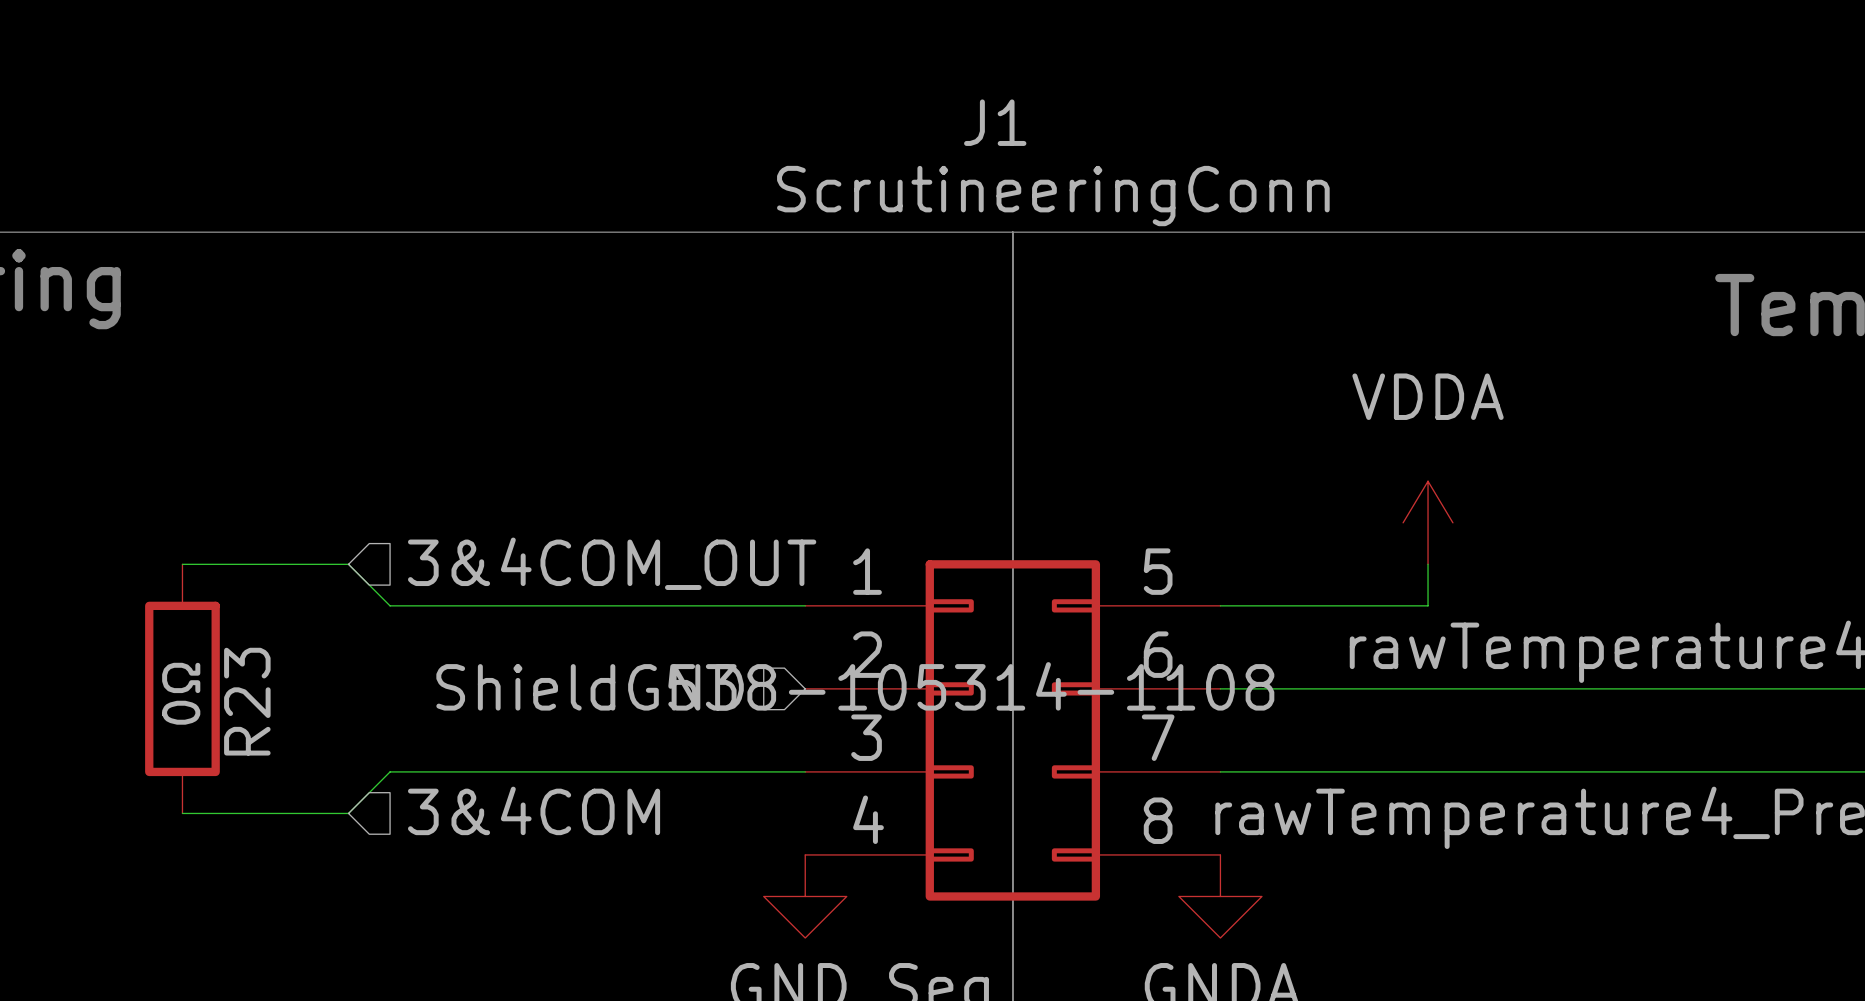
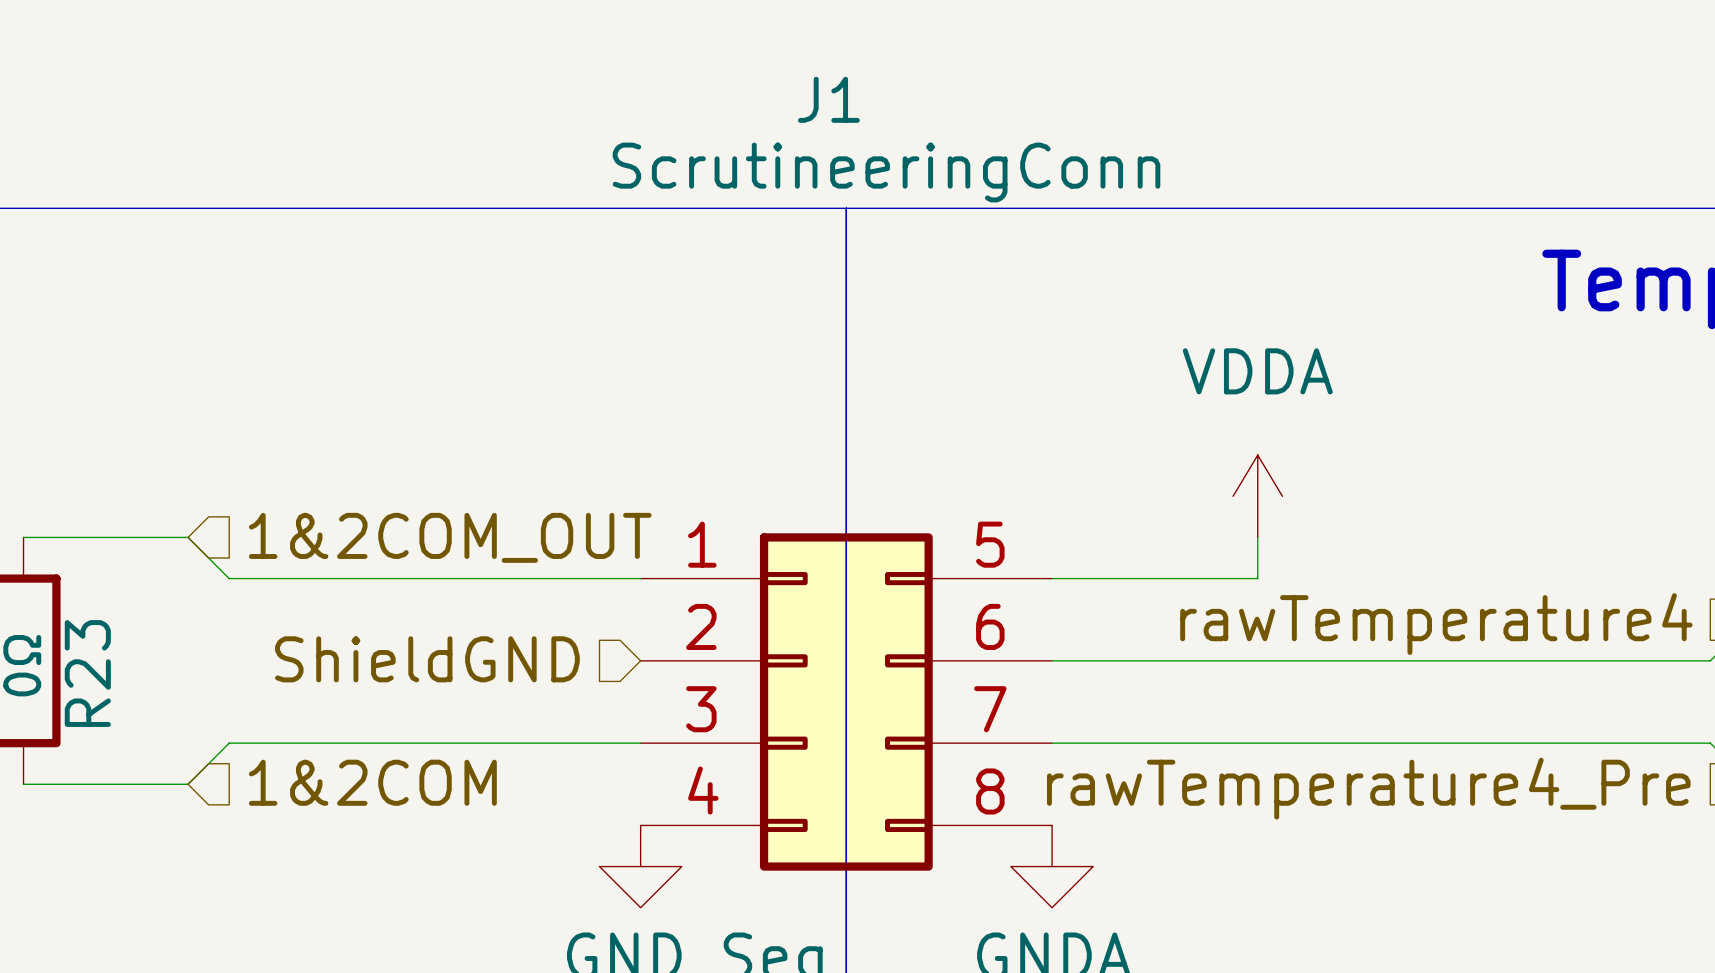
hierarchical label: 3&4COM_OUT (612, 563) -> 1&2COM_OUT (450, 537)
J1 text: 538-105314-1108 (971, 686) -> none
hierarchical label: 3&4COM (534, 810) -> 1&2COM (372, 782)

